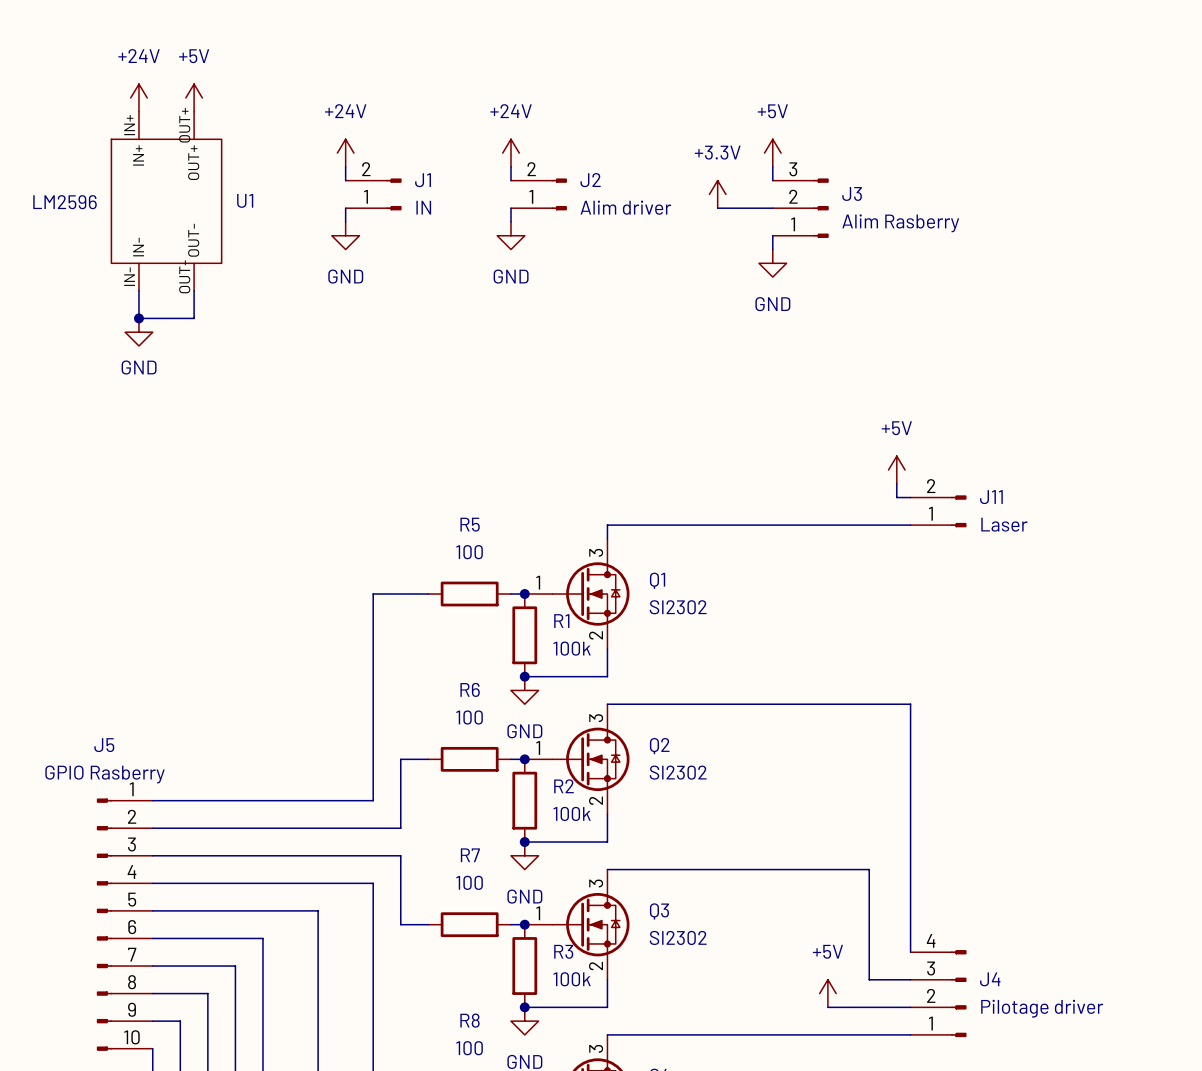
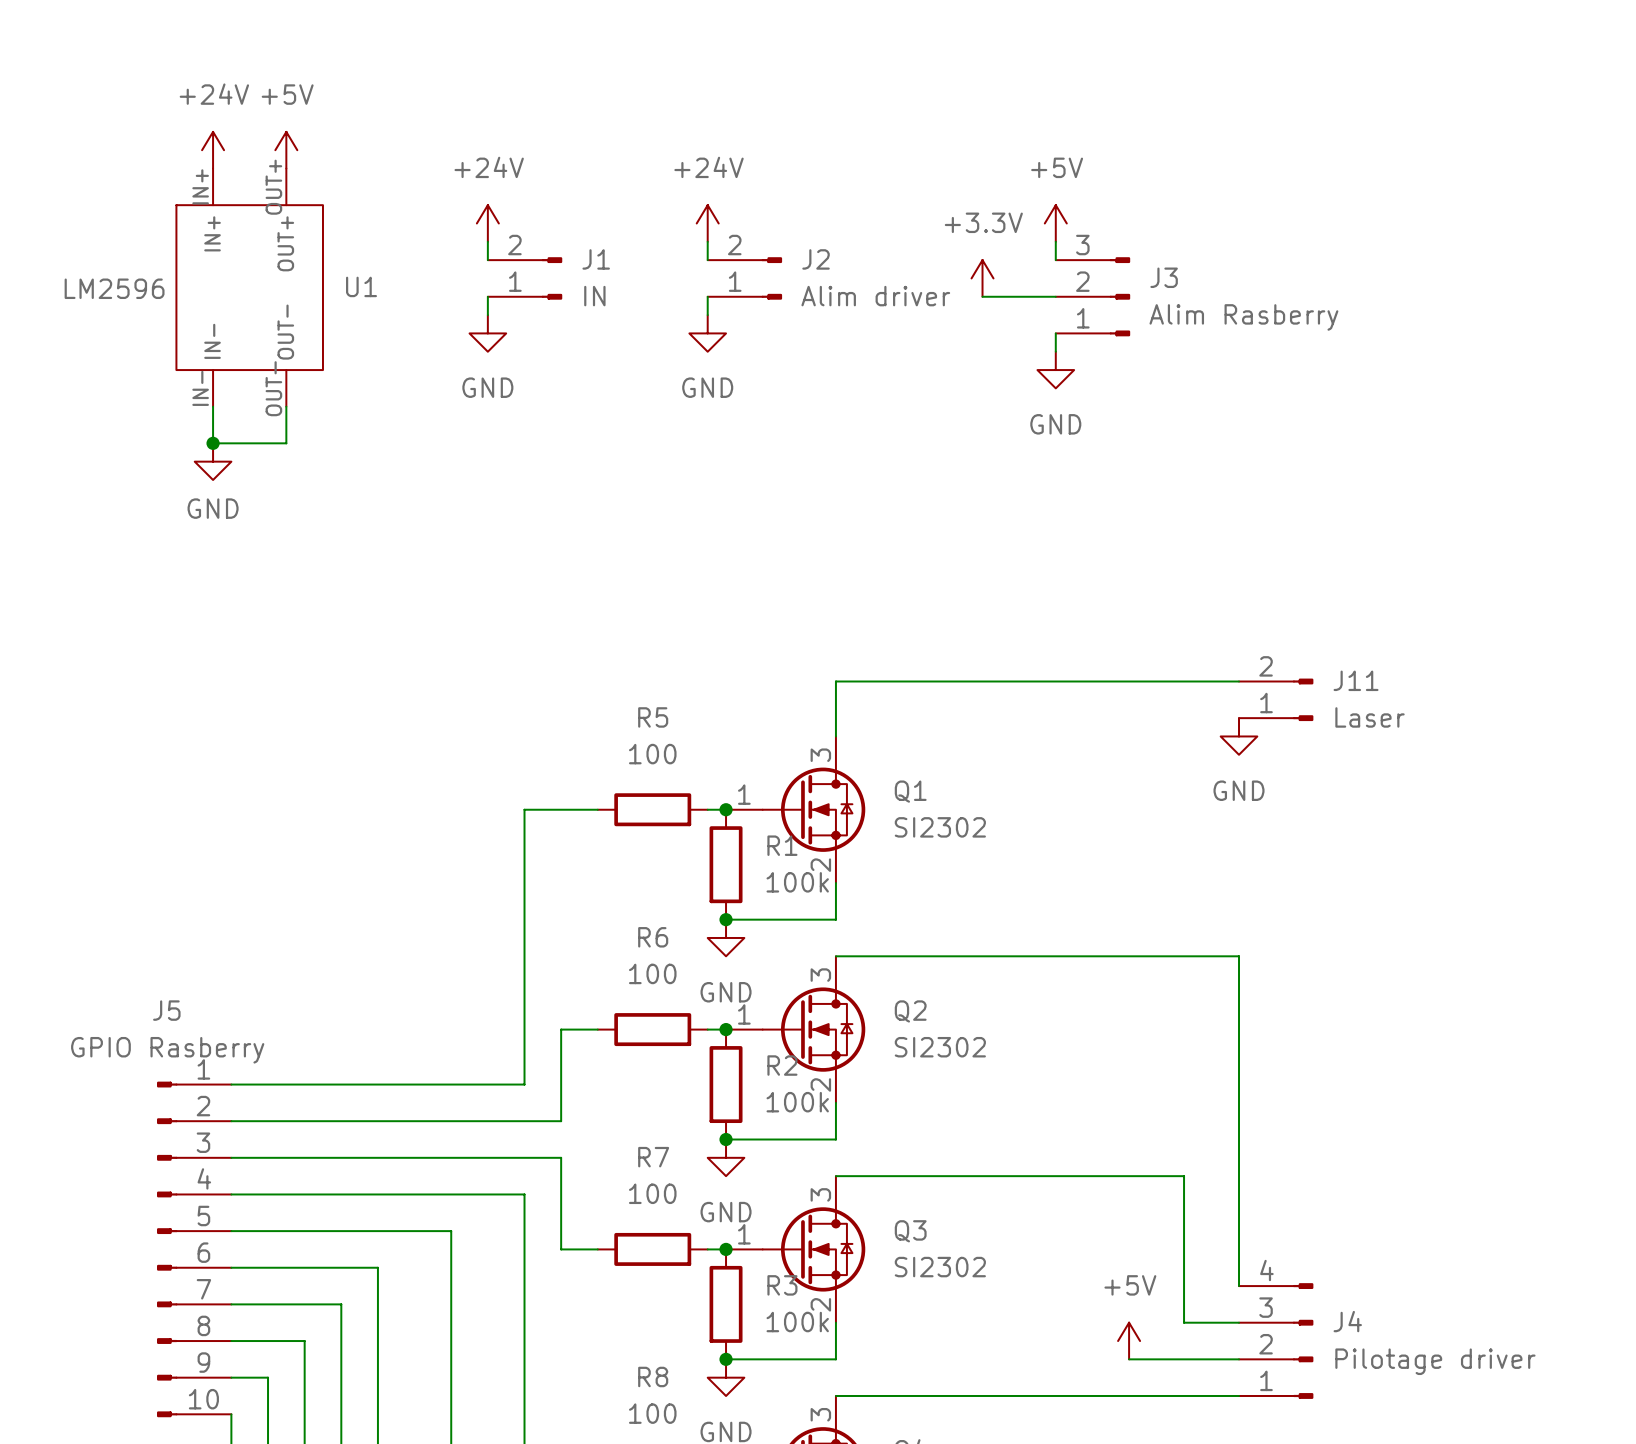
power symbol: +5V (896, 469) -> none
wire: (896, 483) (896, 497) -> none
wire: (607, 525) (910, 525) -> (835, 718) (835, 681) (1220, 681)
power symbol: none -> GND (1239, 736)

